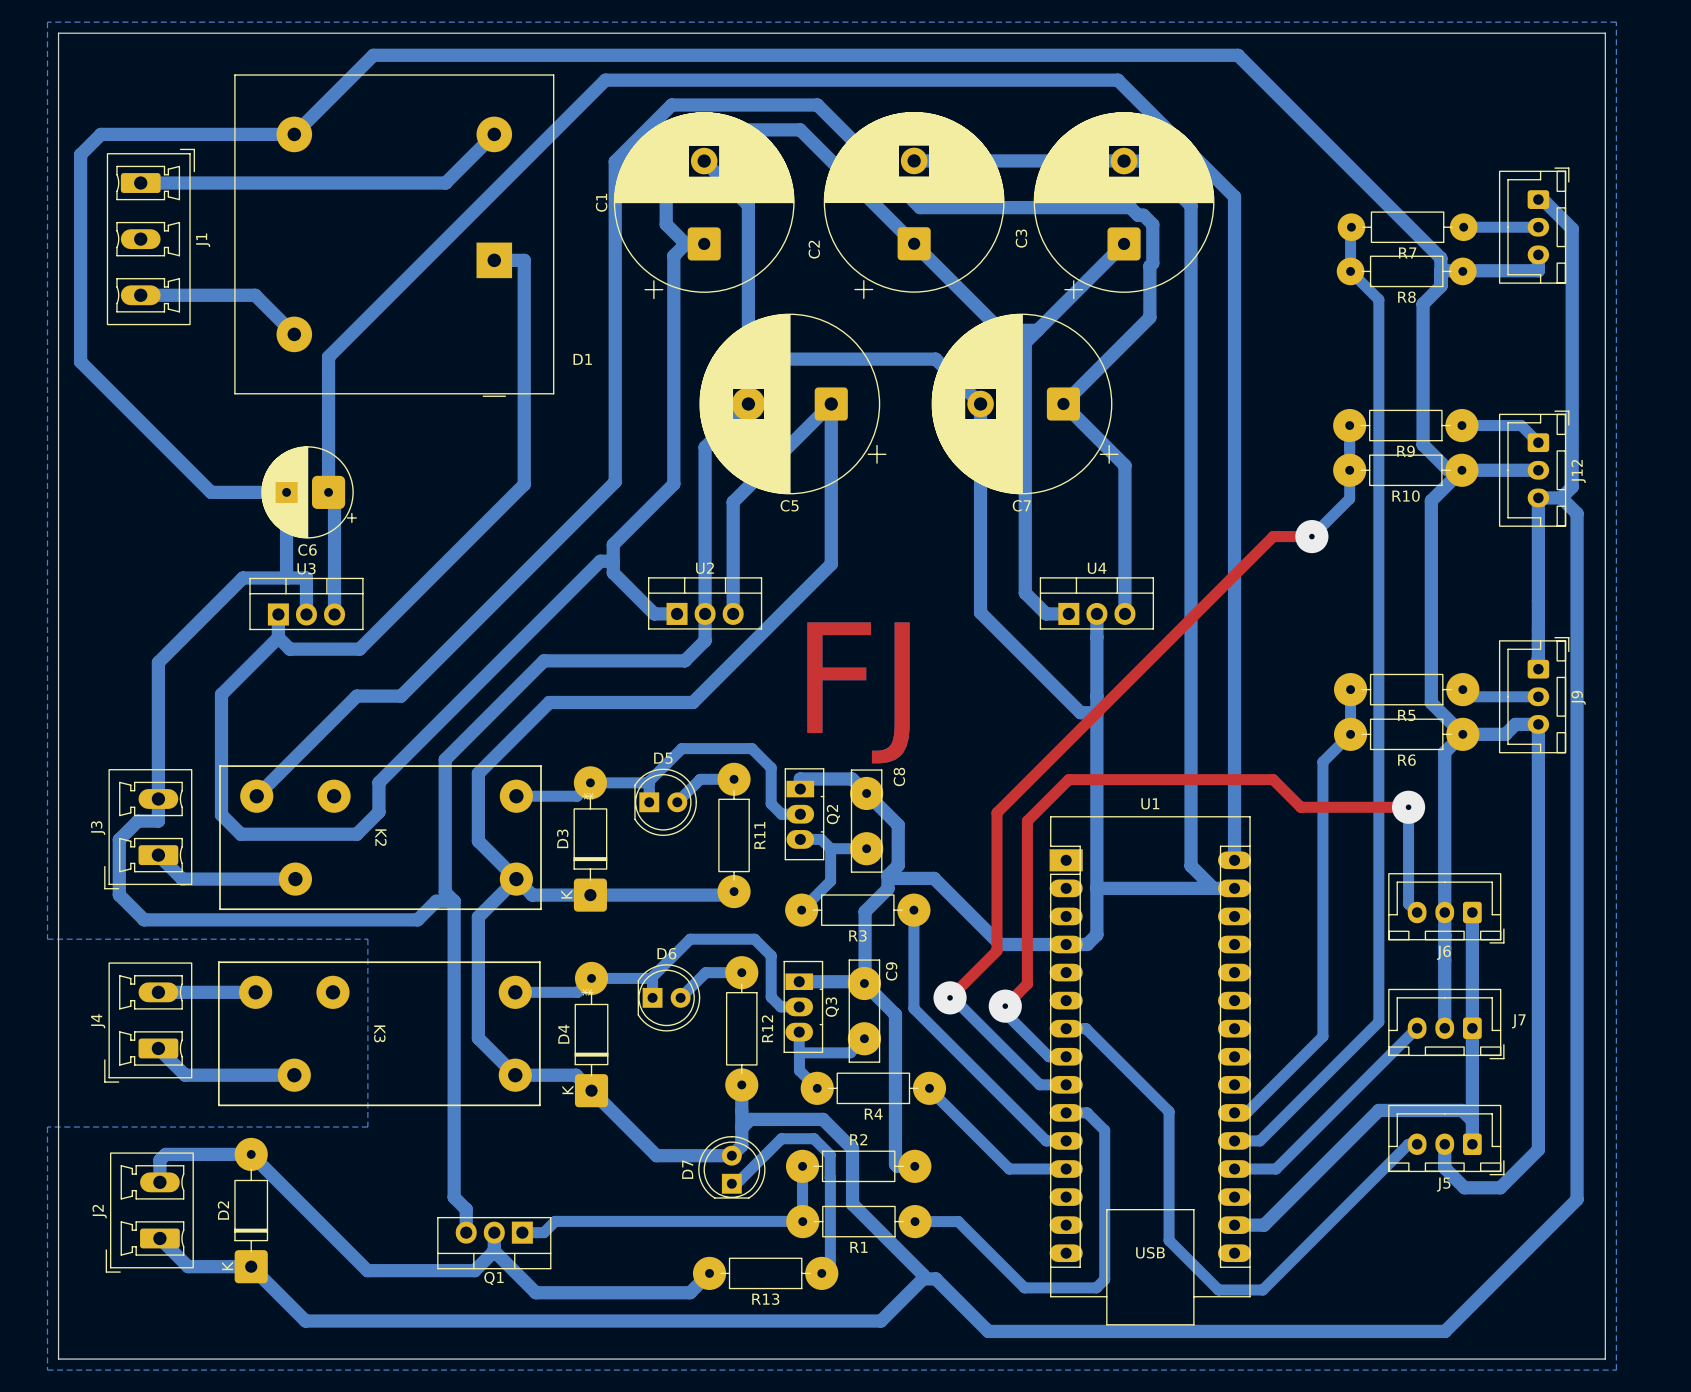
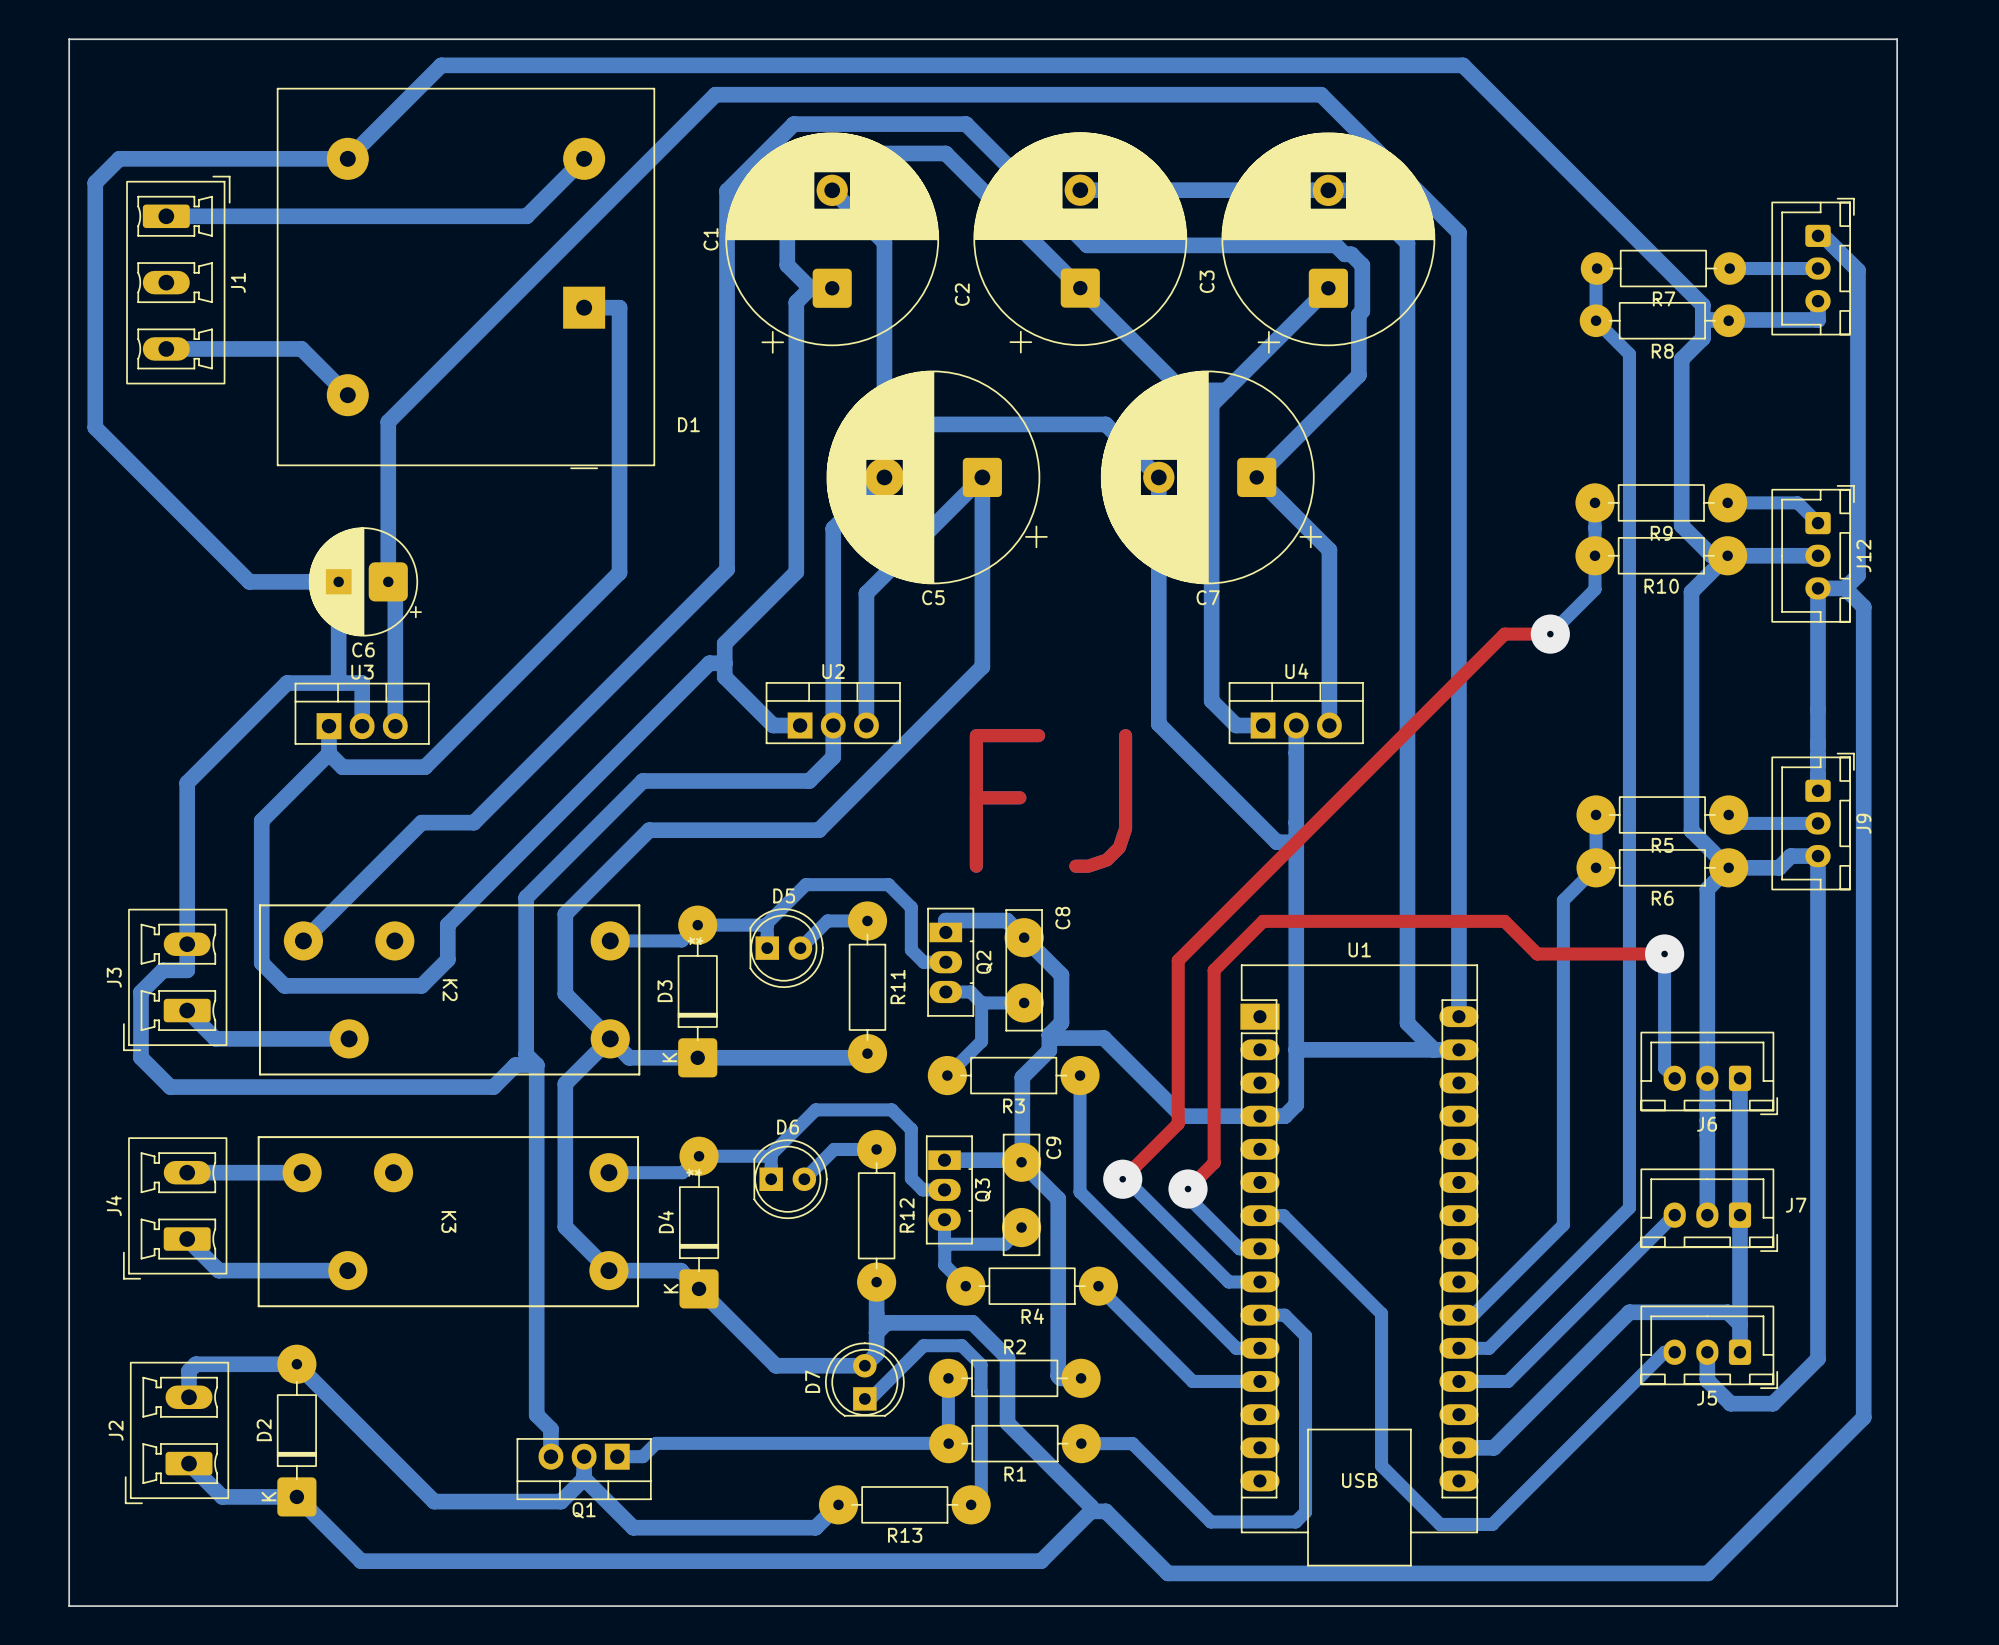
bottom zone outline: (47, 22) (47, 939) (367, 939) (367, 1127) (47, 1127) (47, 1370) (1616, 1370) (1616, 22) (47, 22) -> none

